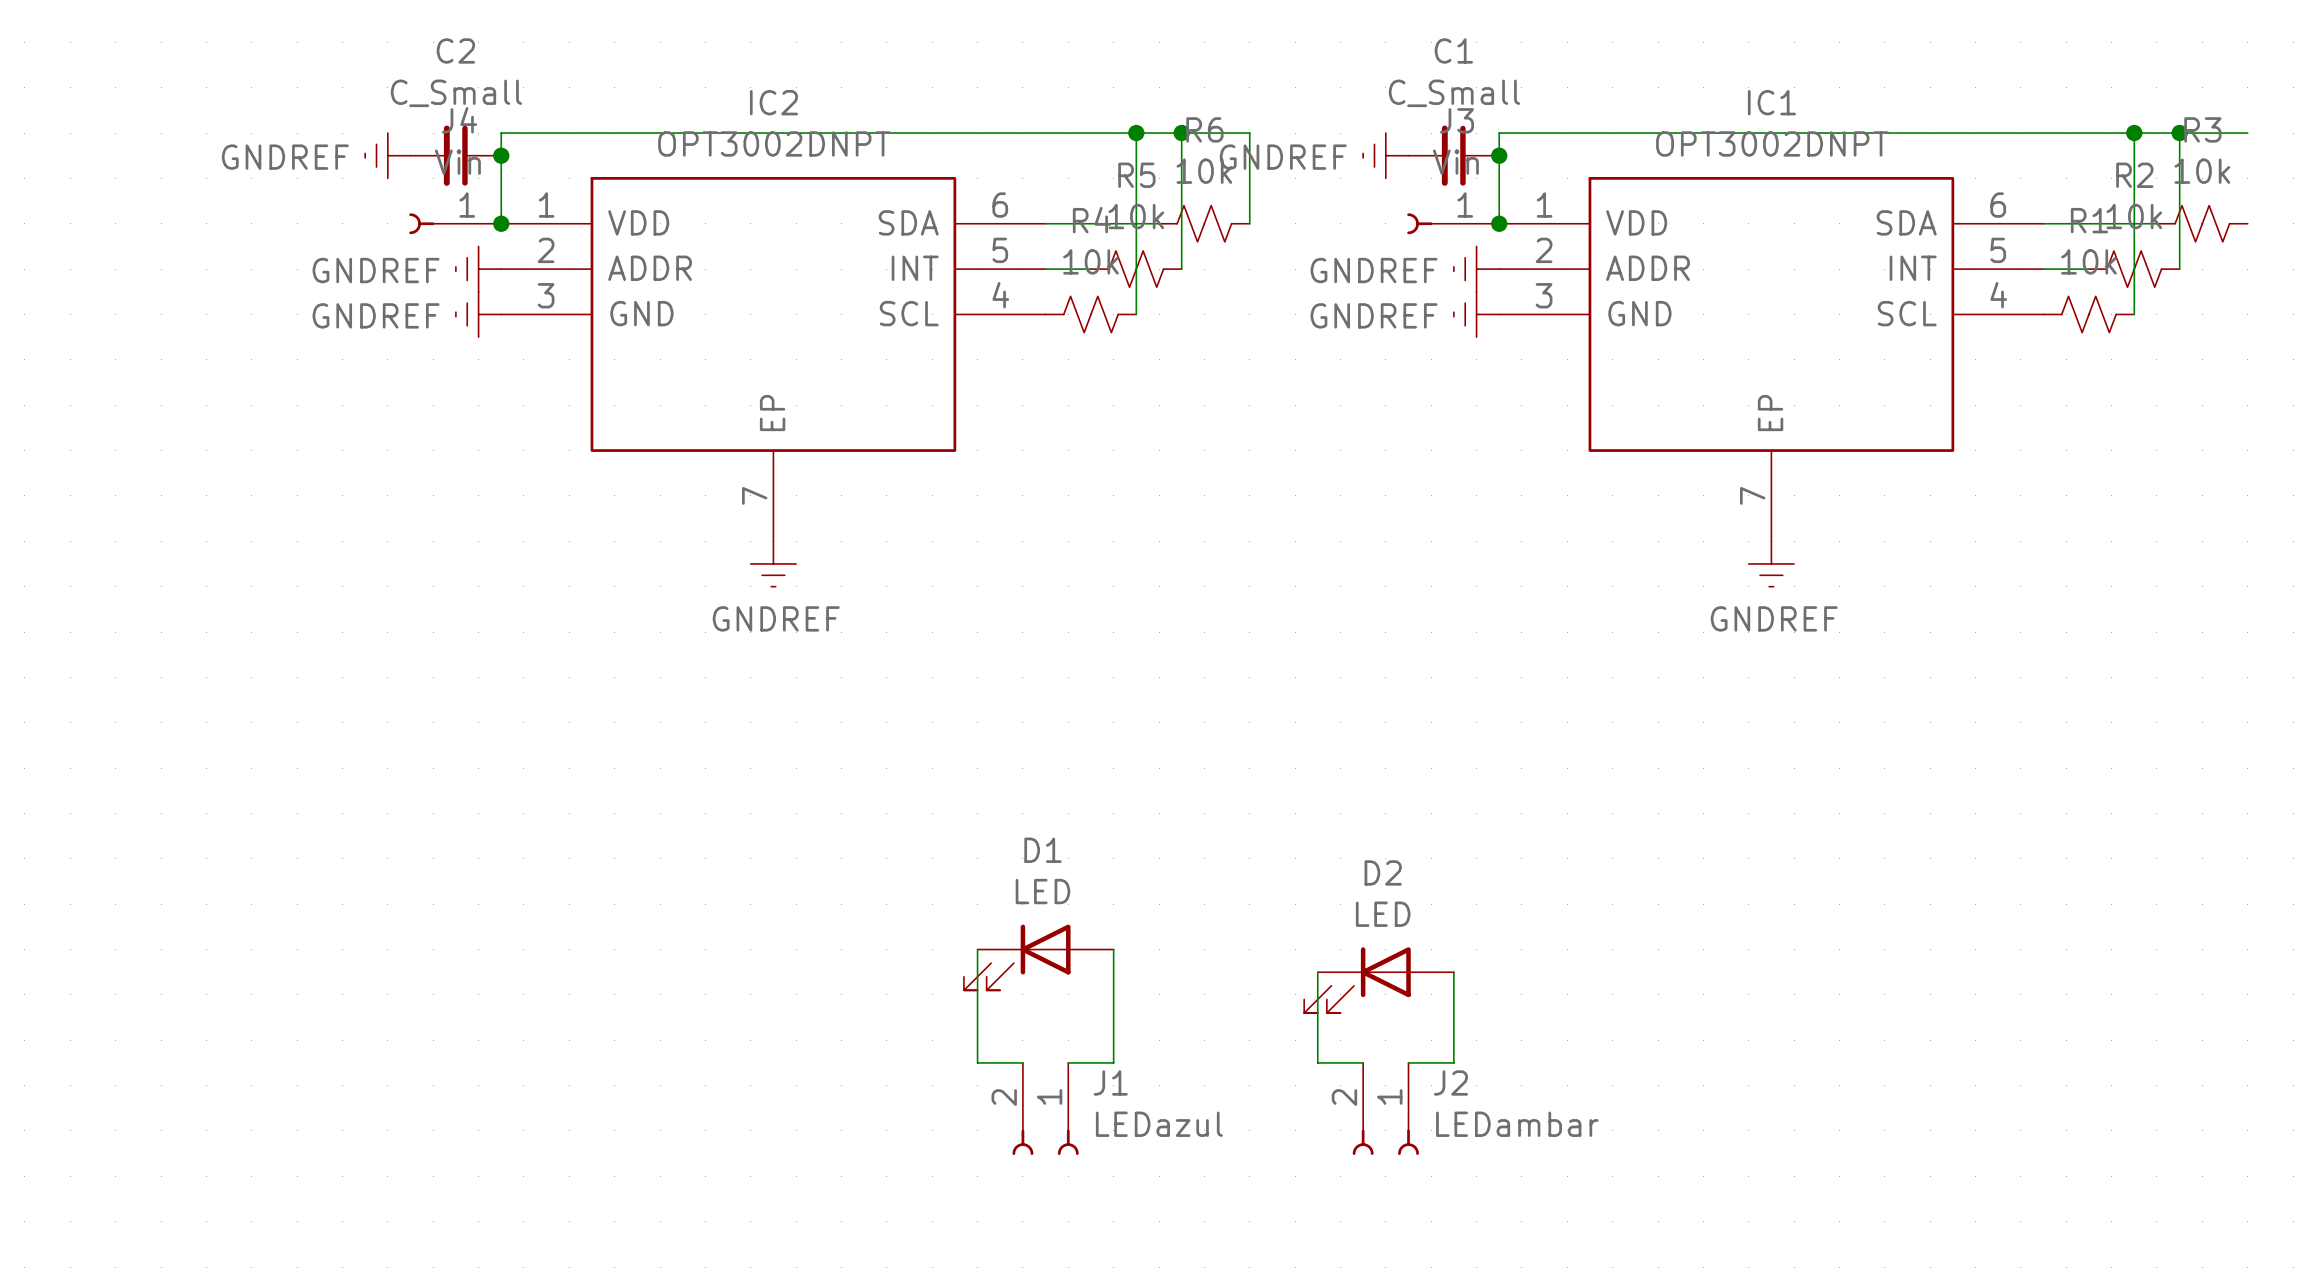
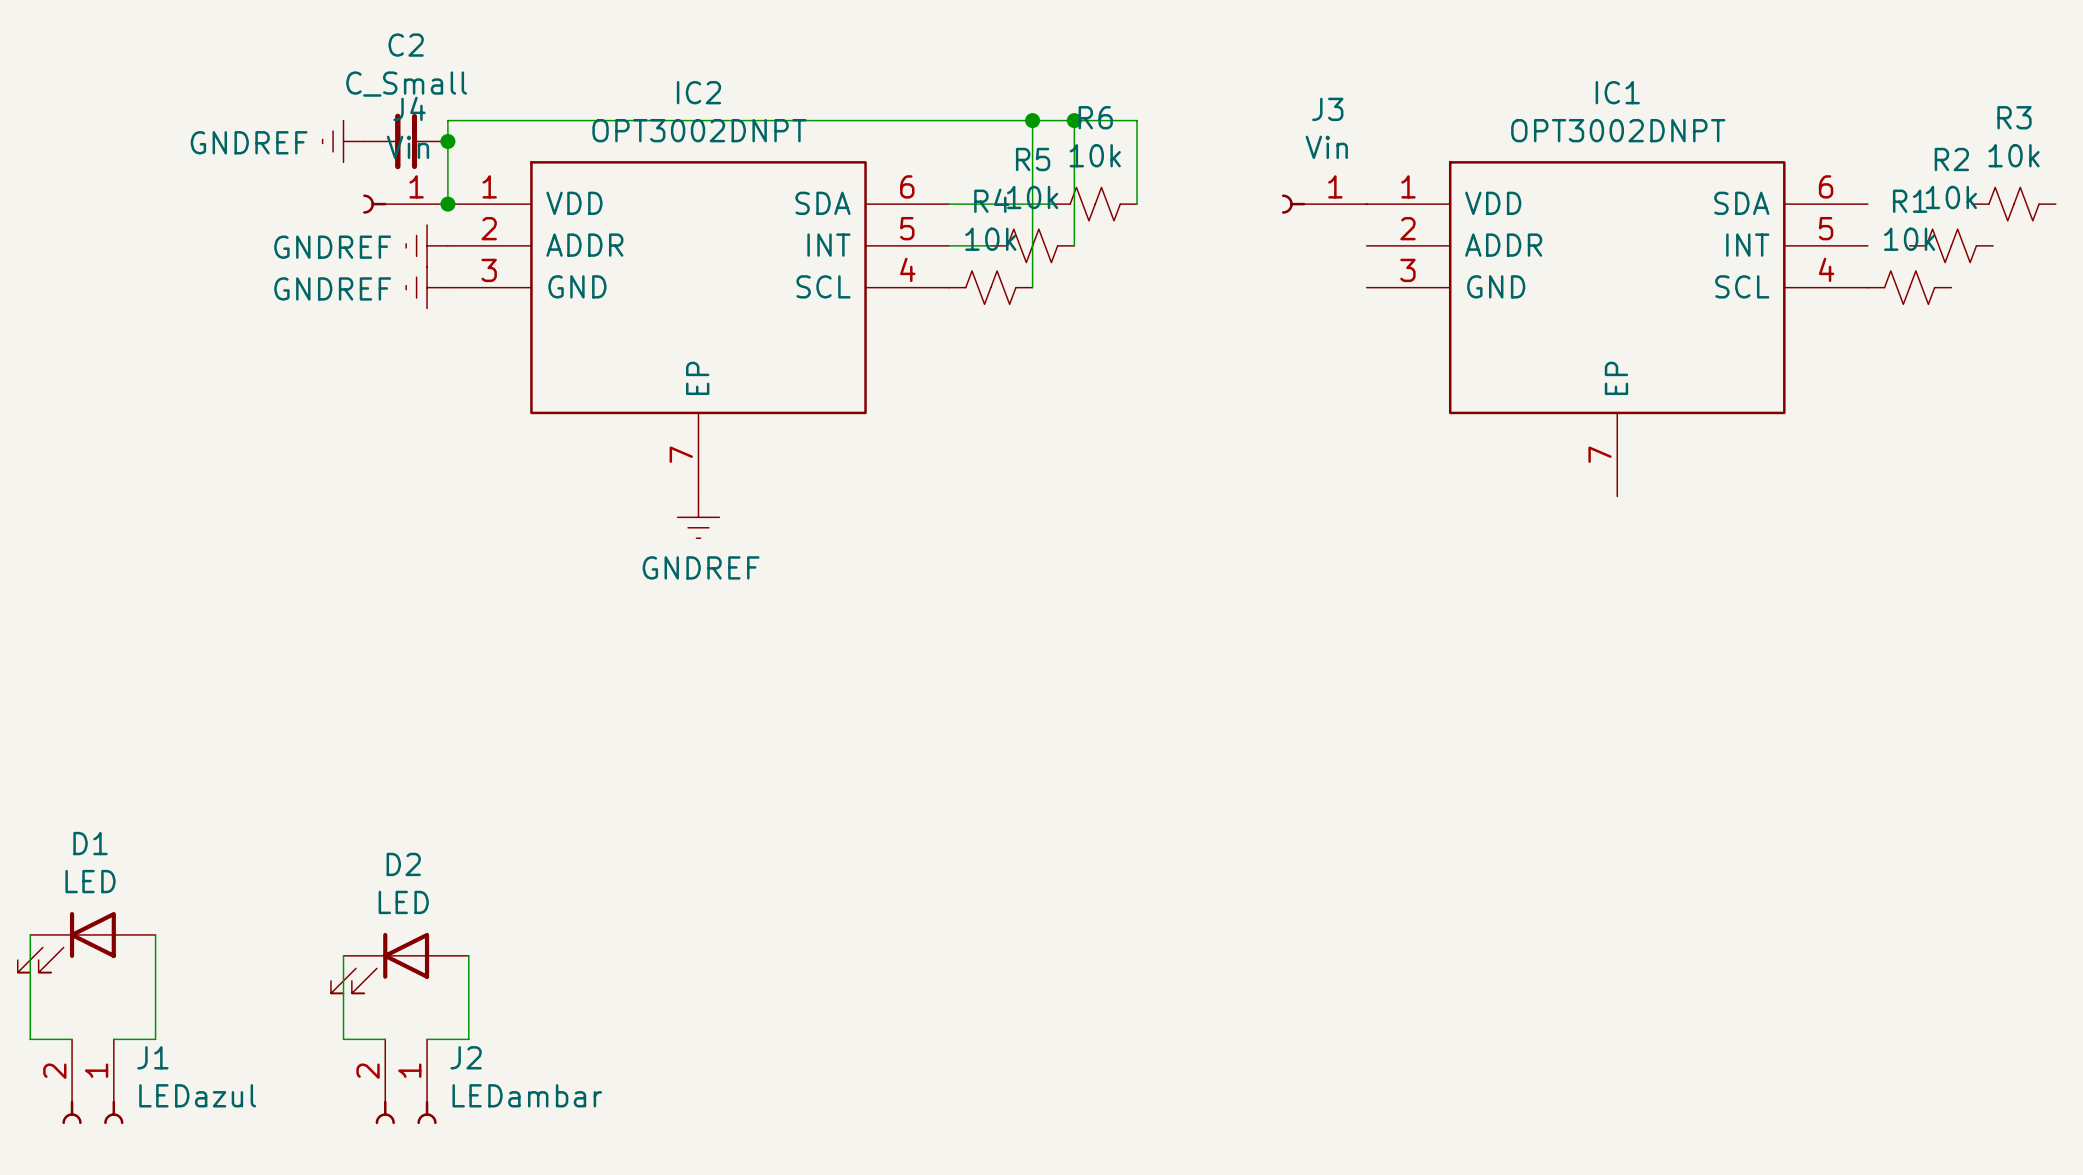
wire: (2134, 133) (2134, 314) -> none
junction: (2134, 133) -> none
wire: (2179, 133) (2179, 269) -> none
junction: (2179, 133) -> none
wire: (2247, 133) (1499, 133) (1499, 223) -> none
power symbol: GNDREF (1385, 155) -> none
C1: C_Small (1453, 155) -> none
junction: (1499, 155) -> none
junction: (1499, 223) -> none
wire: (2043, 223) (2156, 223) -> none
power symbol: GNDREF (1476, 269) -> none
wire: (2043, 269) (2088, 269) -> none
power symbol: GNDREF (1476, 314) -> none
power symbol: GNDREF (1771, 563) -> none
wire: (977, 949) (977, 1062) (1022, 1062) -> none
wire: (1113, 949) (1113, 1062) (1068, 1062) -> none
D1 position: (1038, 957) -> (86, 942)
wire: (1317, 972) (1317, 1062) (1363, 1062) -> none
wire: (1453, 972) (1453, 1062) (1408, 1062) -> none
D2 position: (1379, 980) -> (399, 963)
wire: none -> (30, 934) (30, 1039) (72, 1039)
wire: none -> (155, 934) (155, 1039) (113, 1039)
wire: none -> (343, 955) (343, 1039) (385, 1039)
wire: none -> (468, 955) (468, 1039) (427, 1039)
J1 position: (1045, 1108) -> (92, 1081)
J2 position: (1385, 1108) -> (406, 1081)

